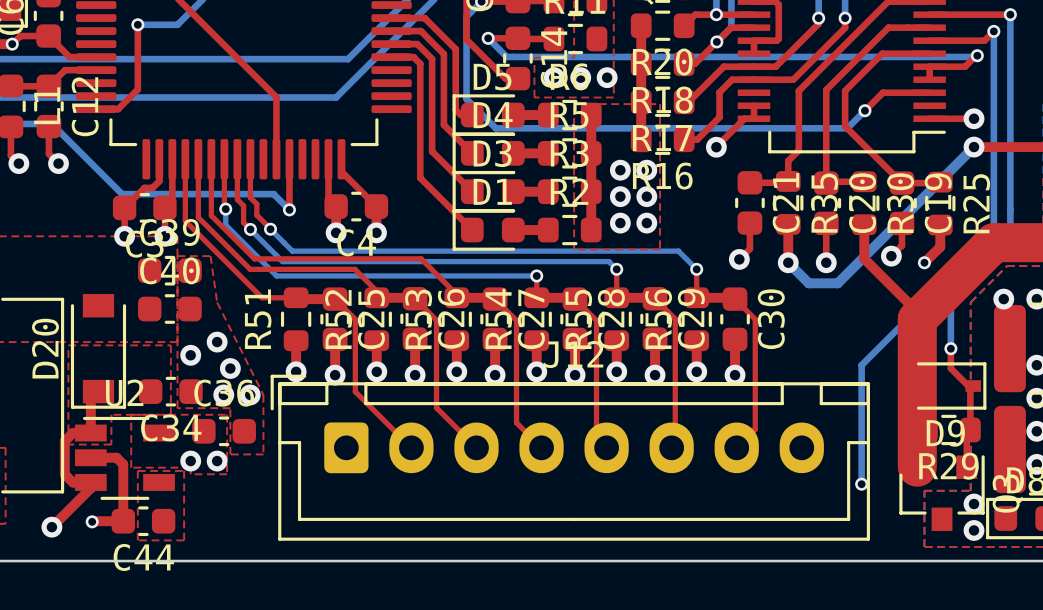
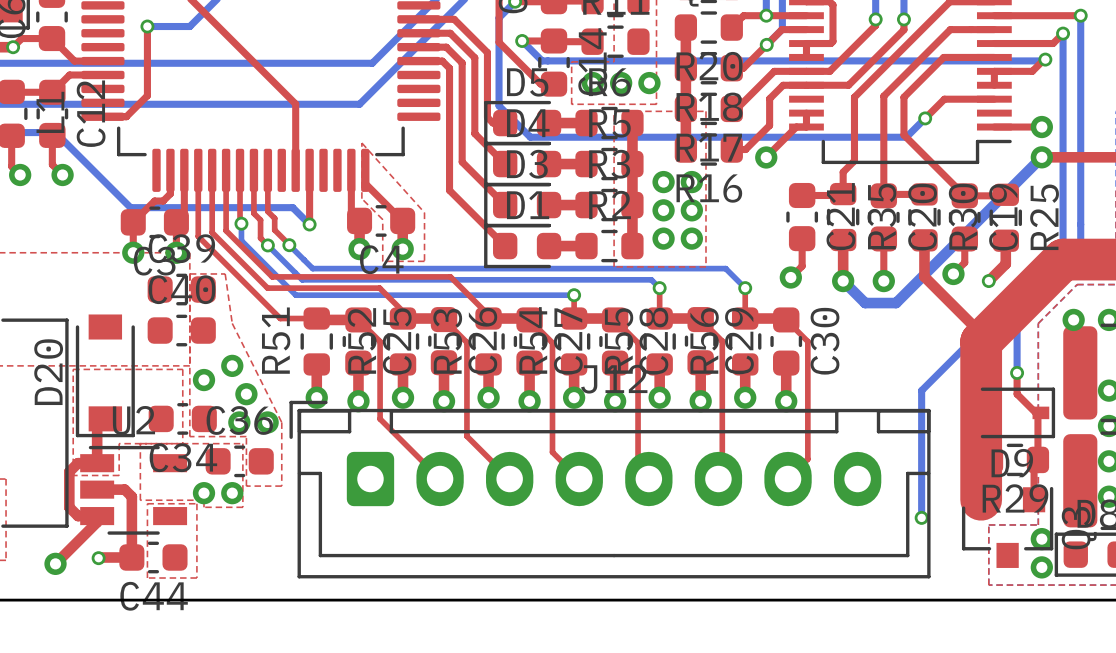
top zone outline: none -> (361, 143) (361, 198) (382, 219) (382, 261) (424, 261) (424, 212) (361, 143)

